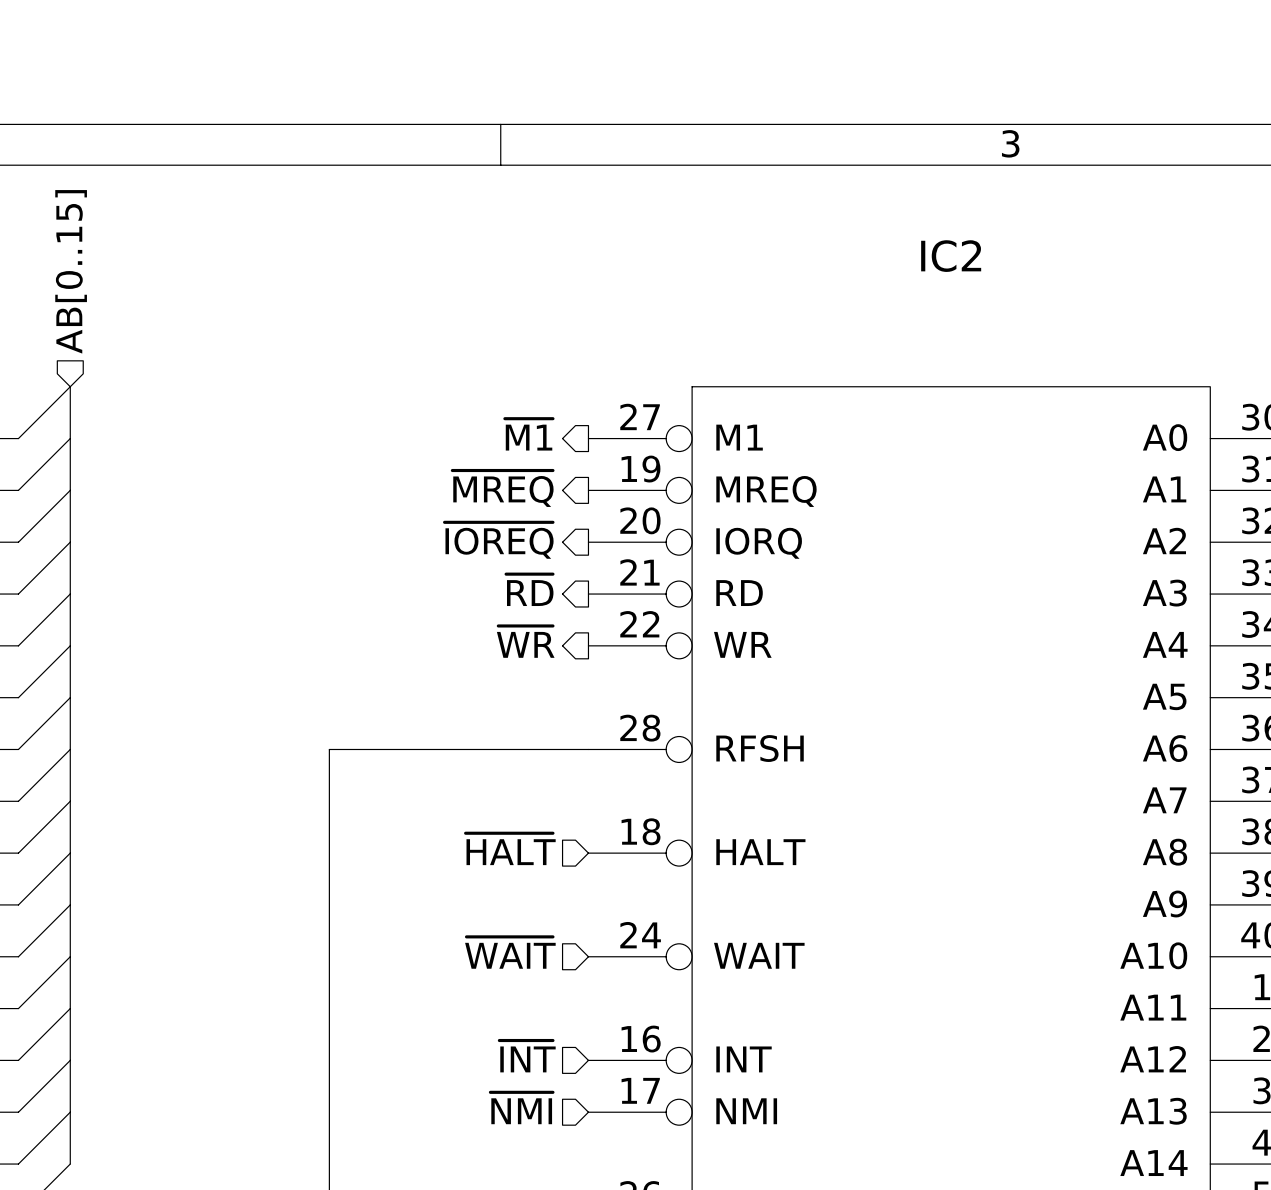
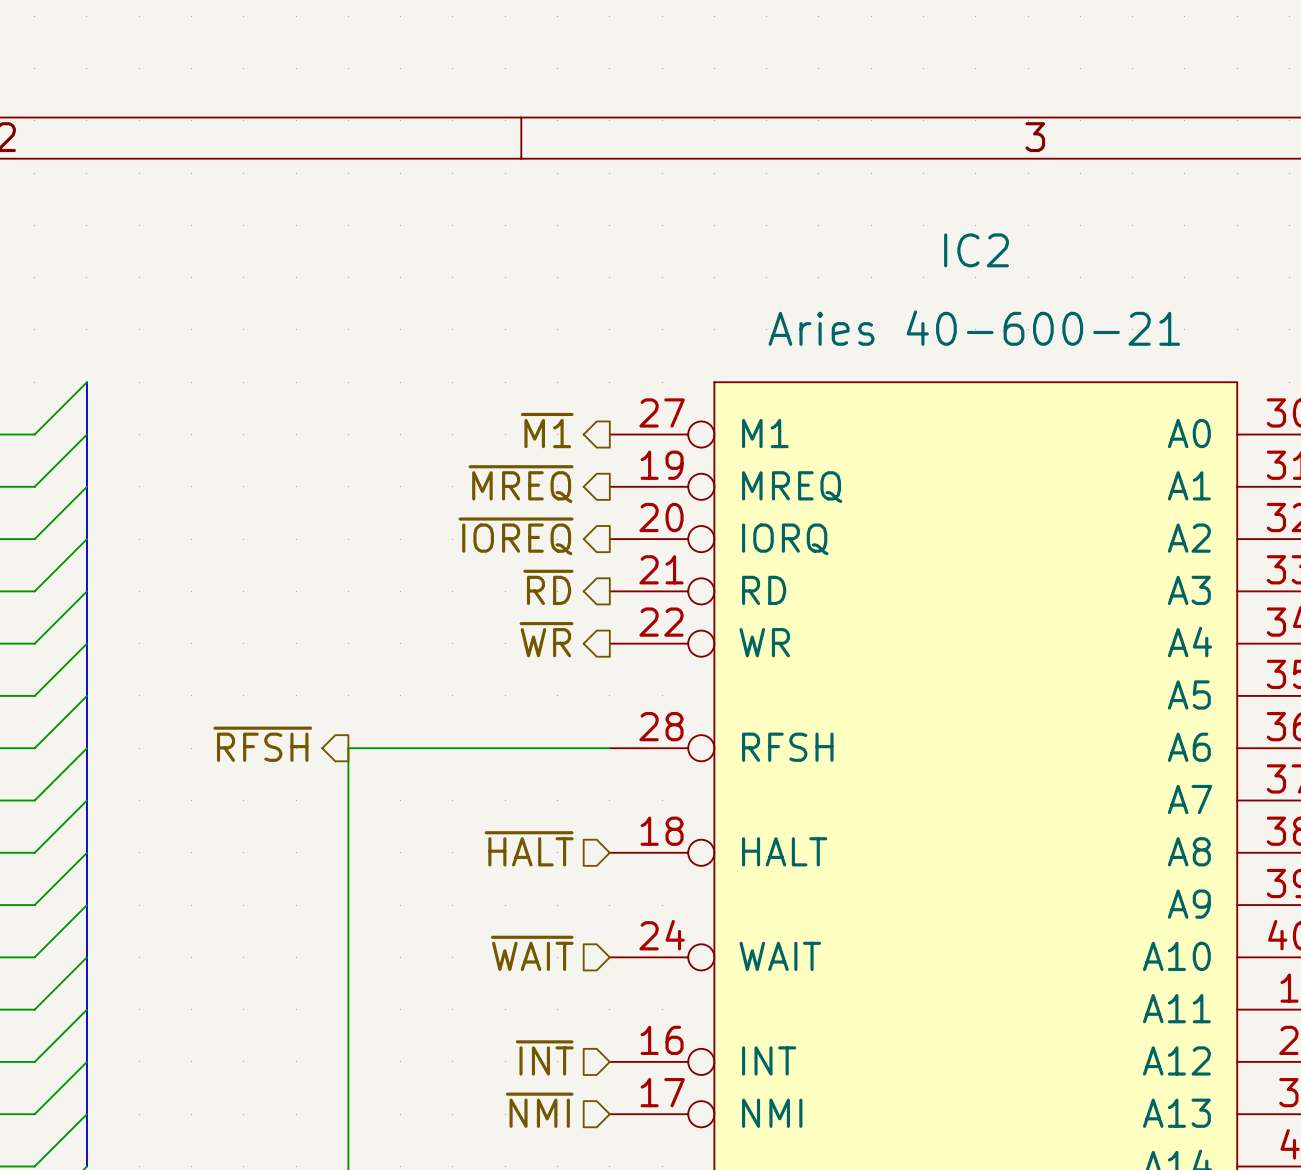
hierarchical label: AB[0..15] (71, 271) -> none
IC2 value: none -> Aries 40-600-21 (974, 328)
hierarchical label: none -> ~{RFSH} (262, 744)

